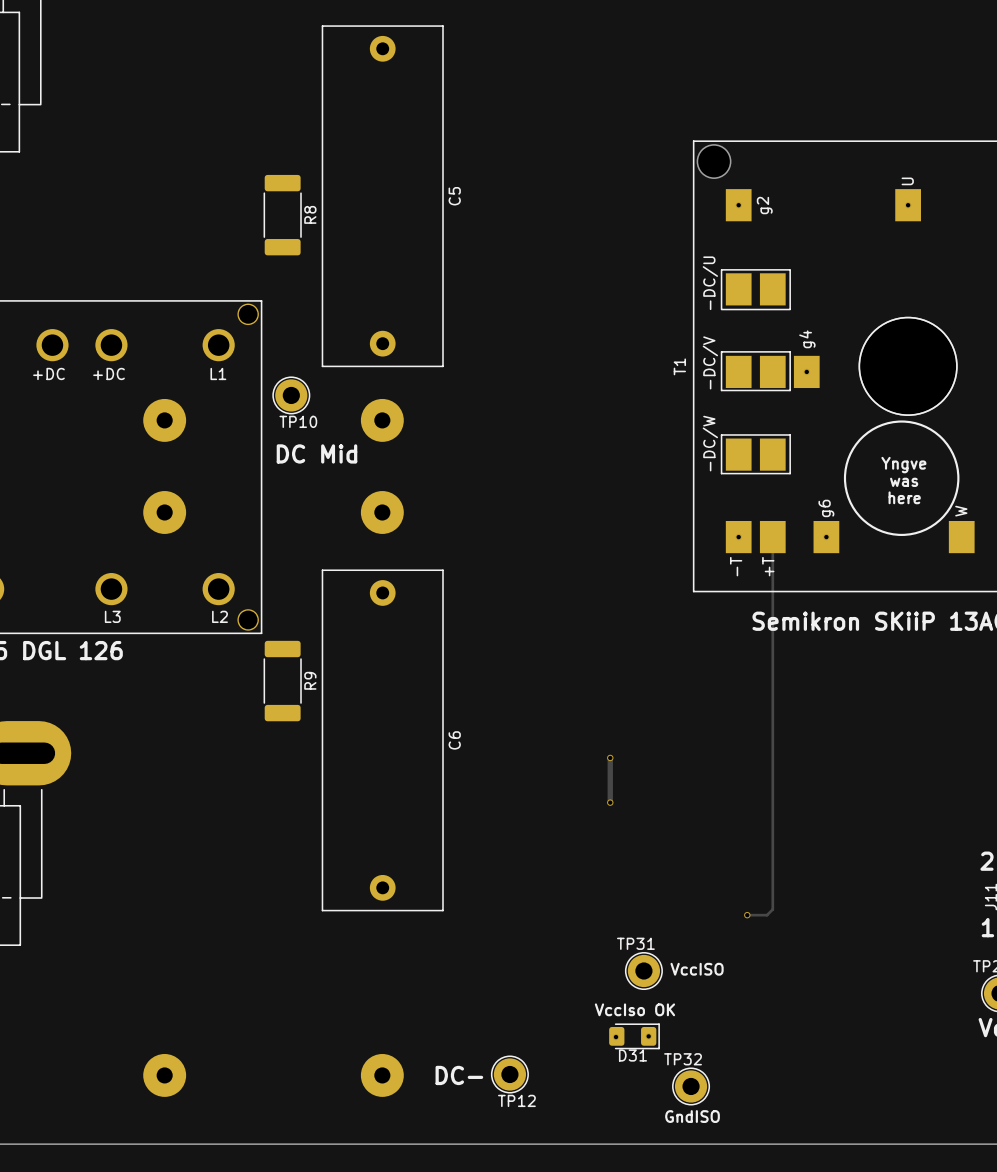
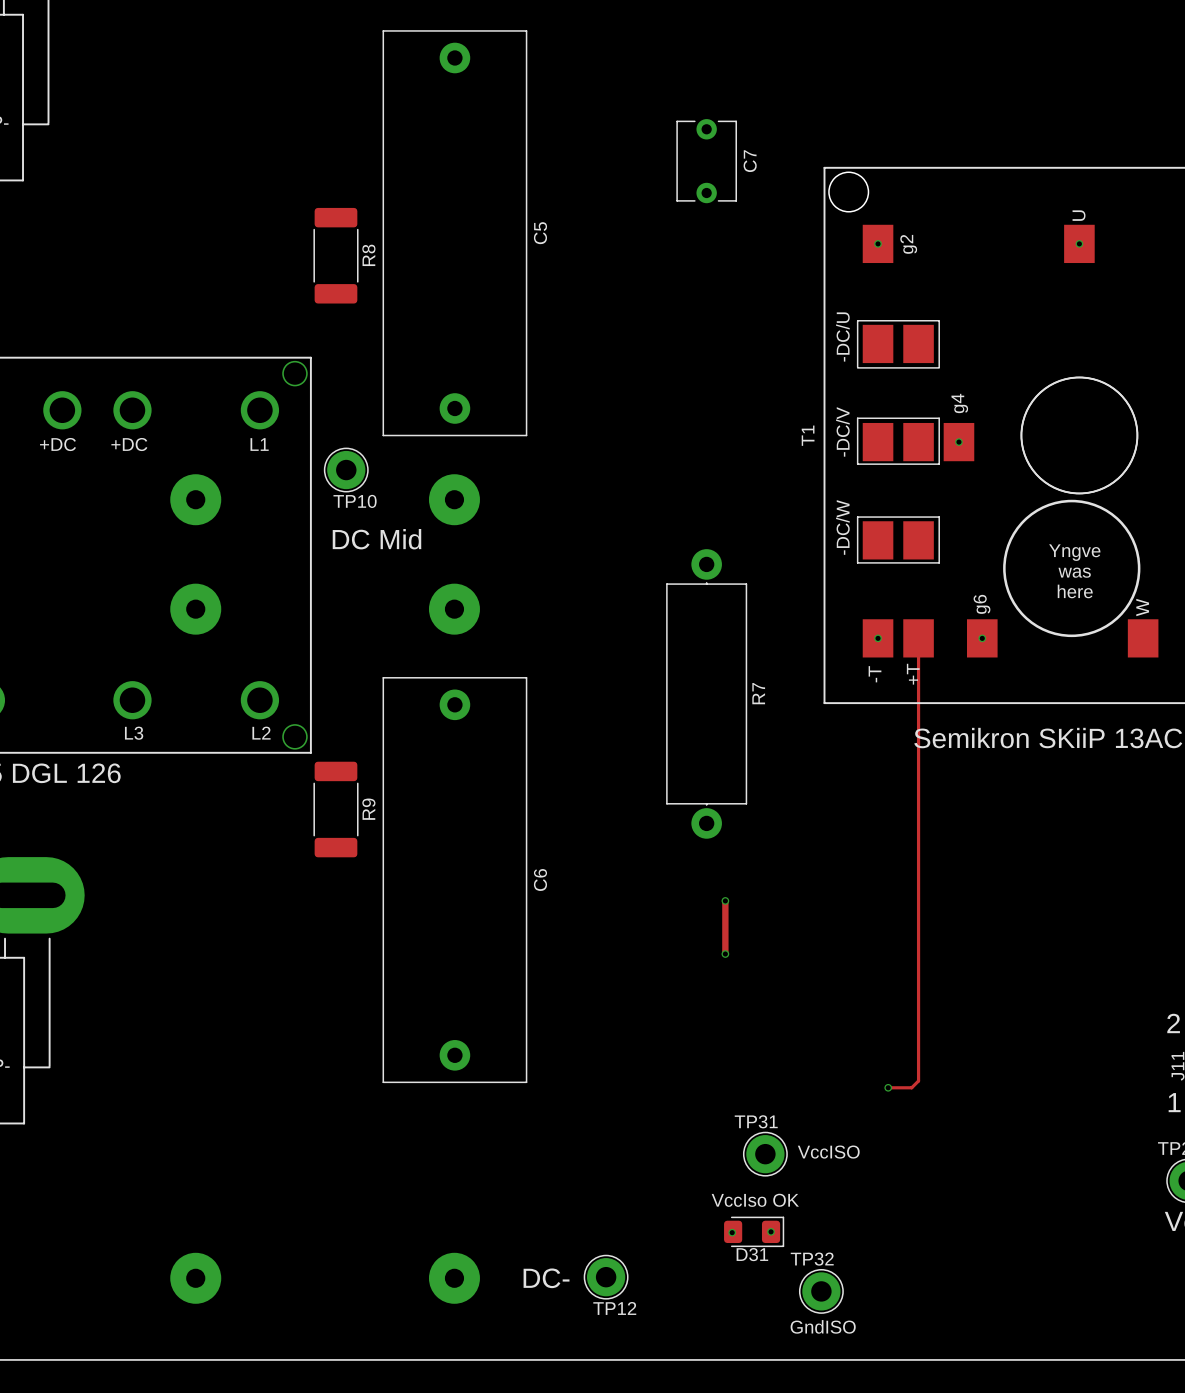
C7: none -> (706, 161)
R7: none -> (706, 693)

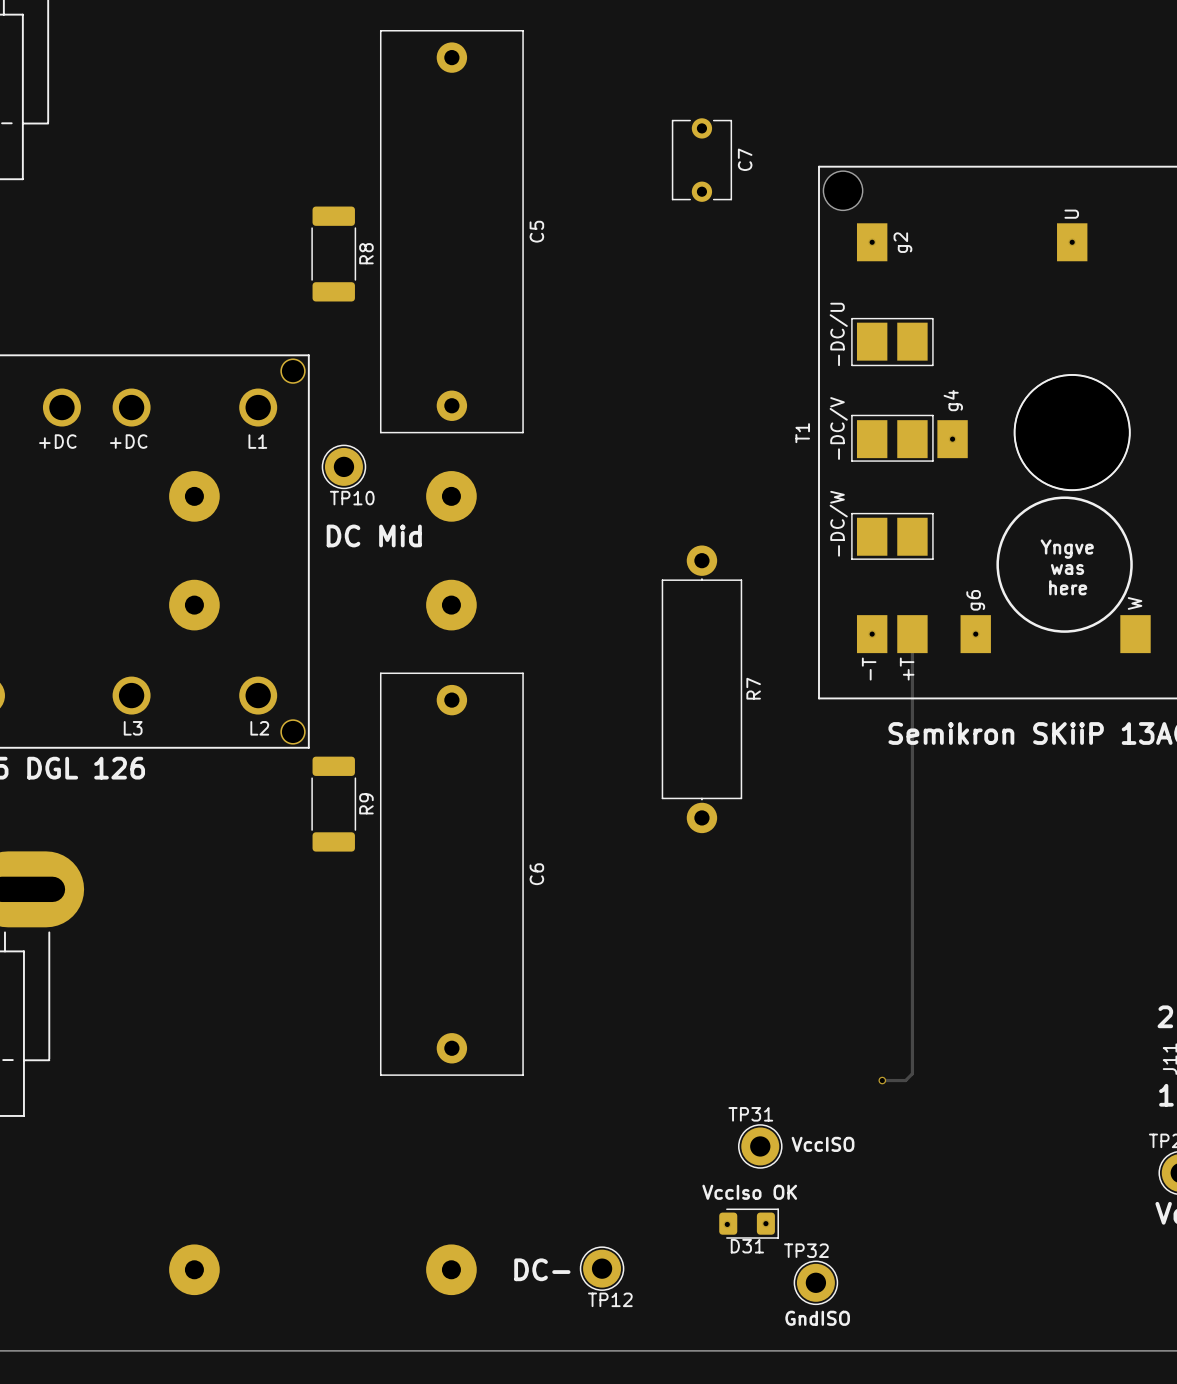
track: (725, 900) (725, 954) -> none
via: (725, 900) -> none
via: (725, 954) -> none

